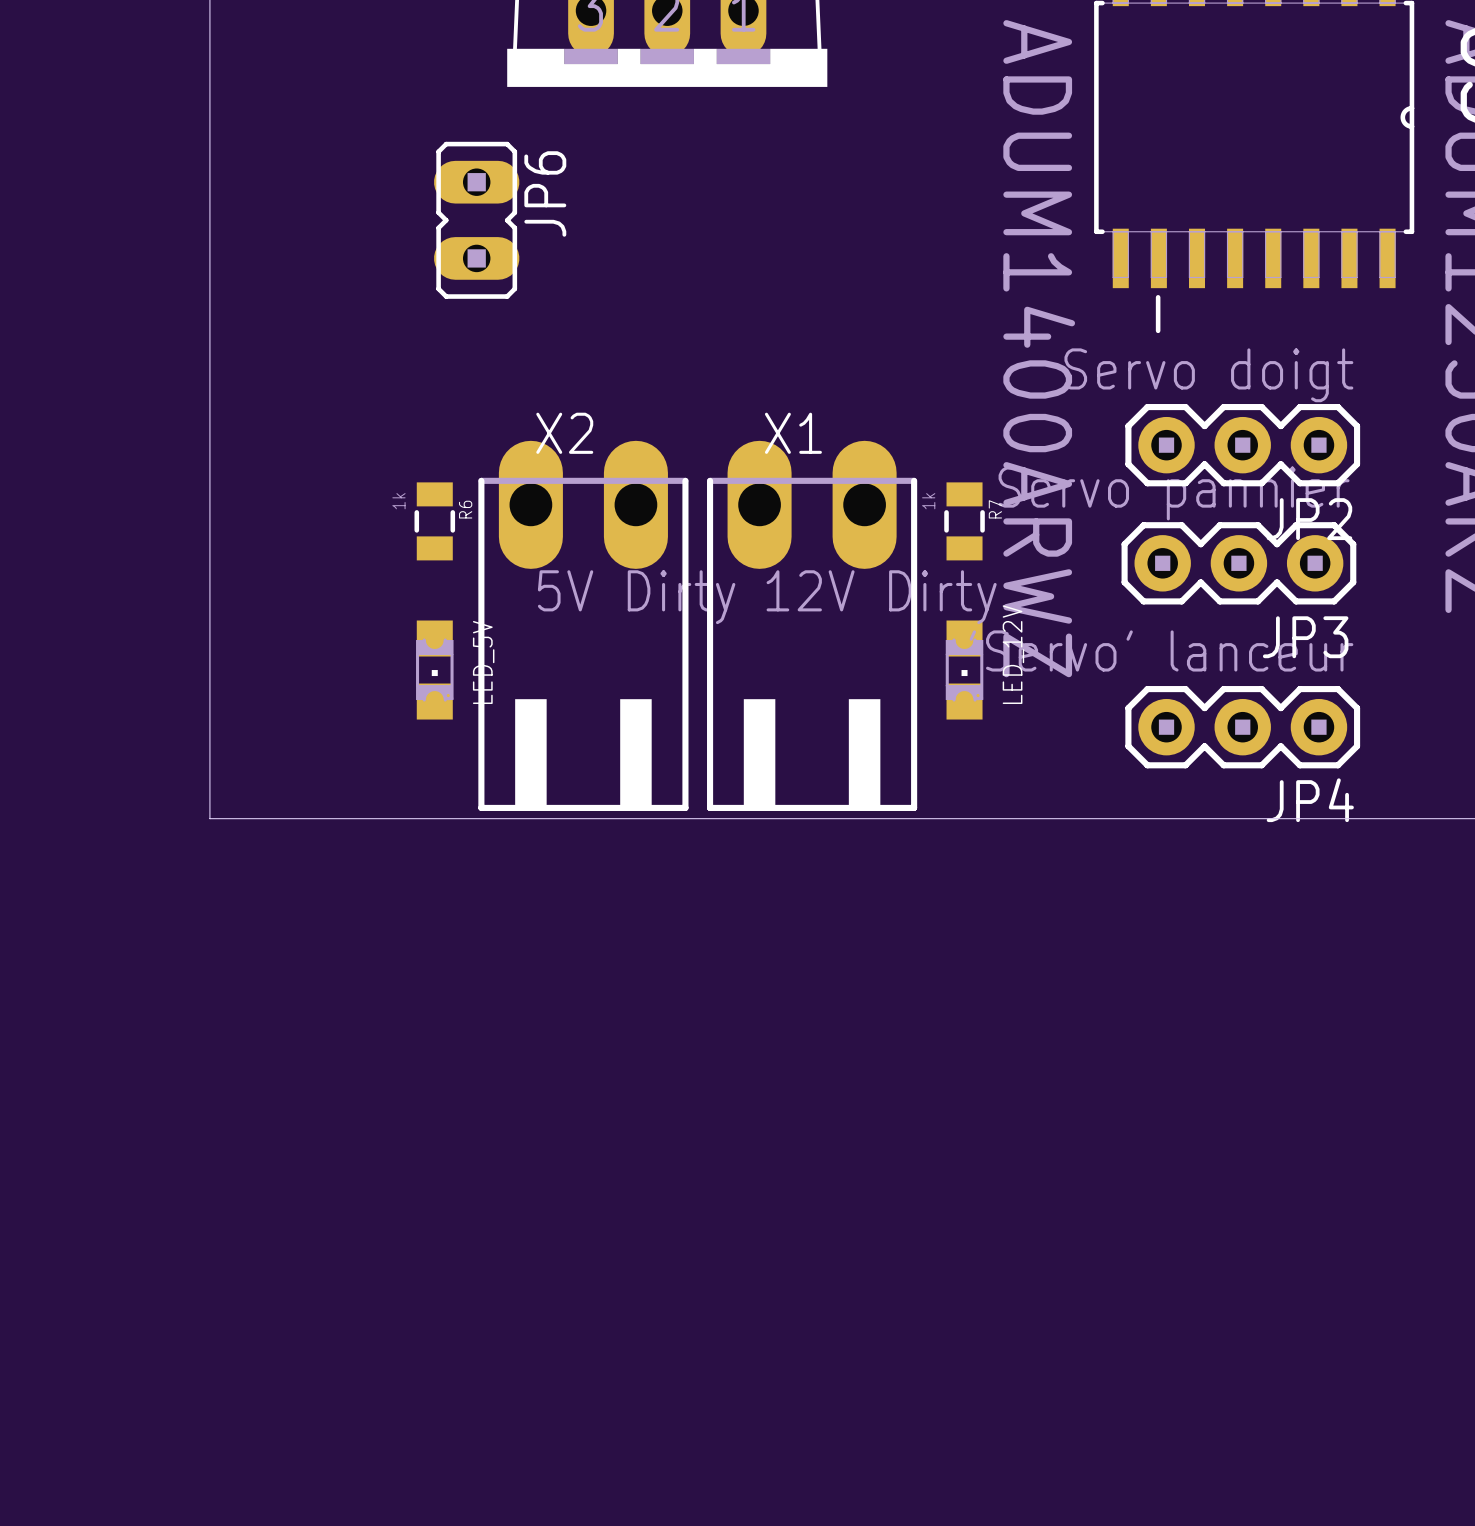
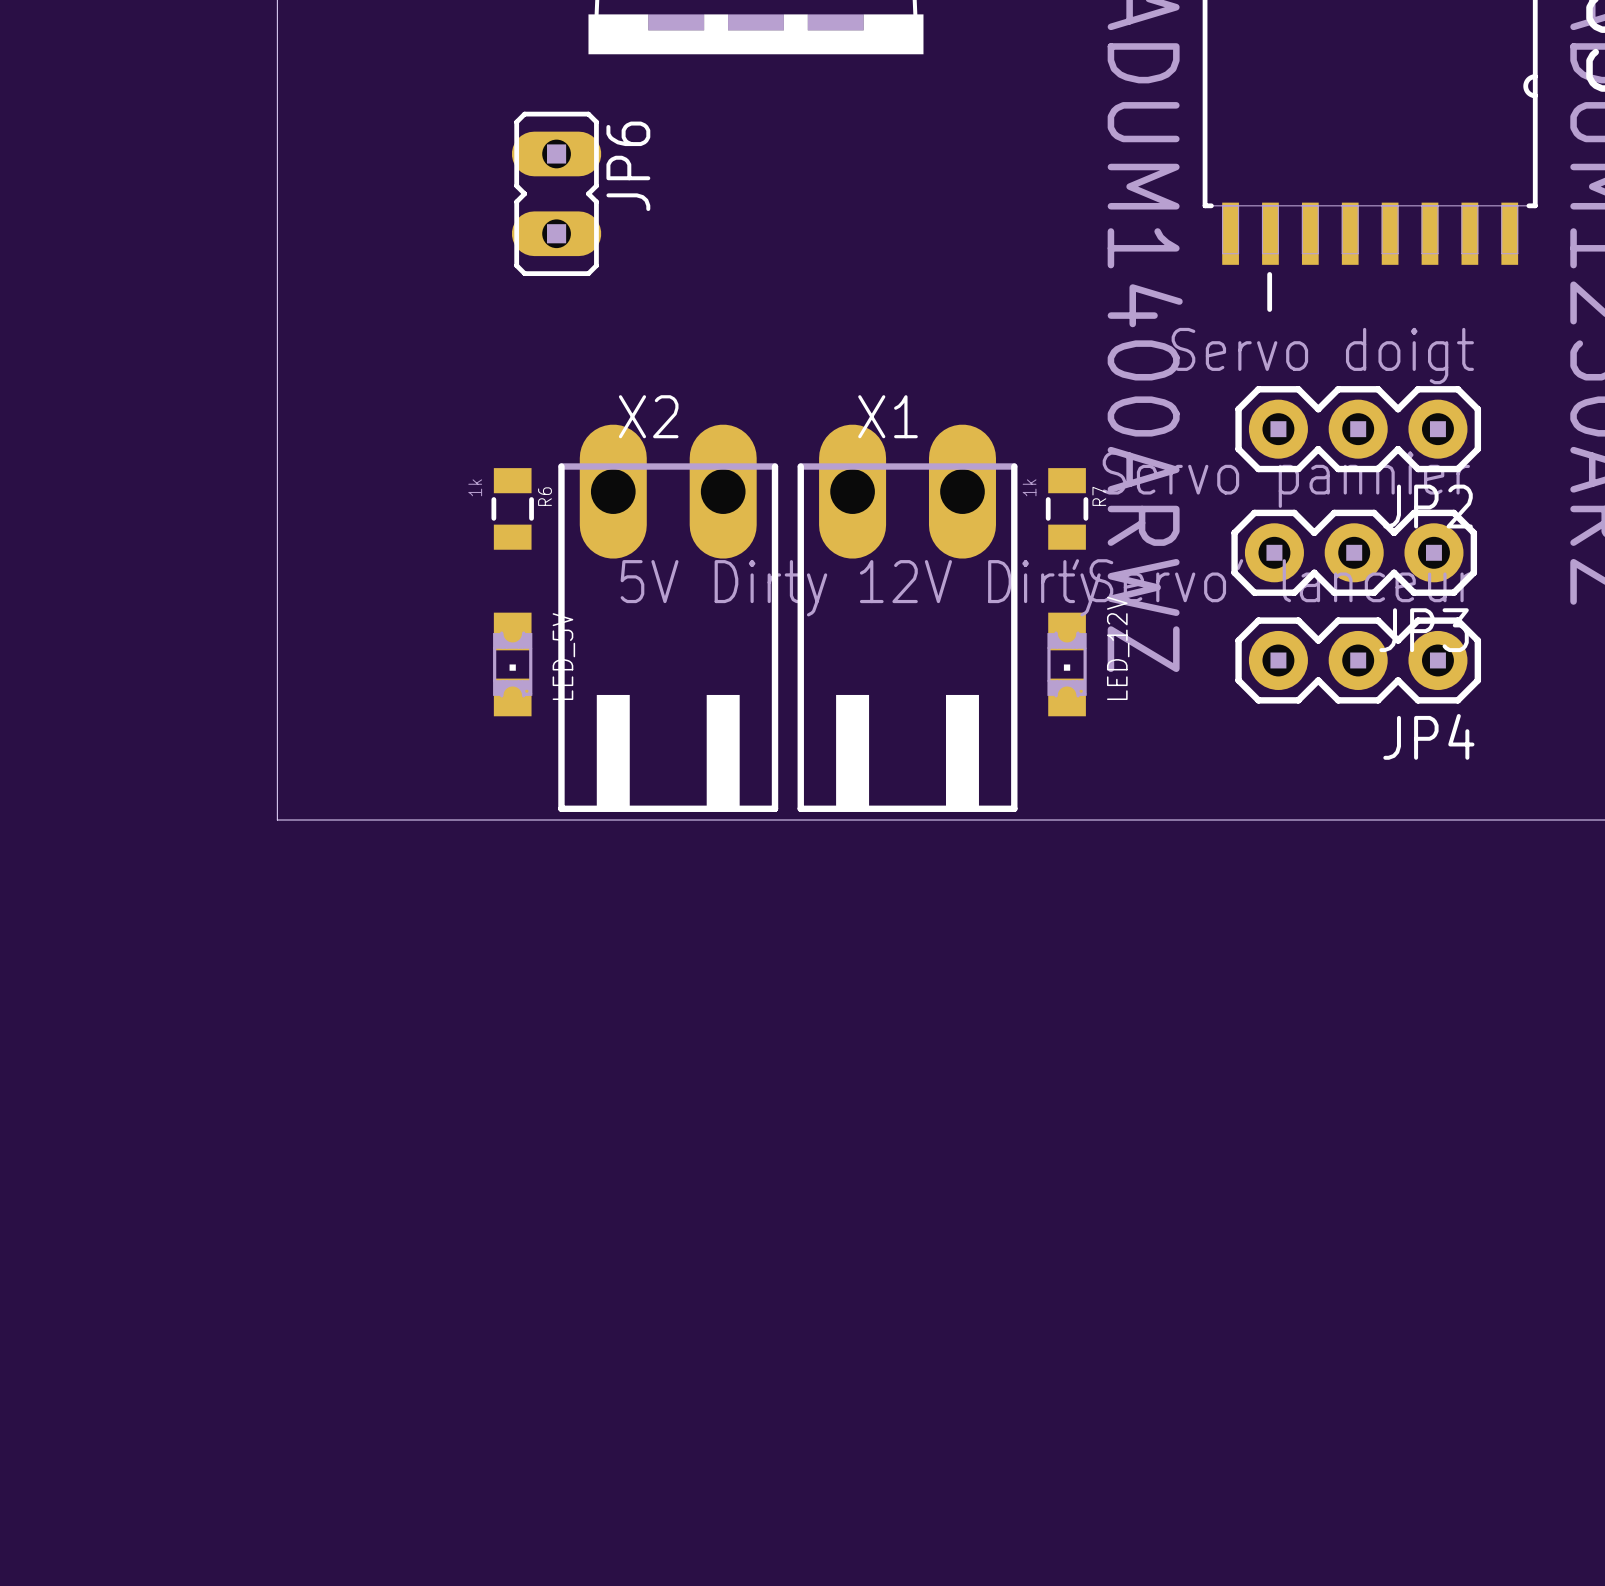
JP4 position: (1242, 727) -> (1358, 660)

